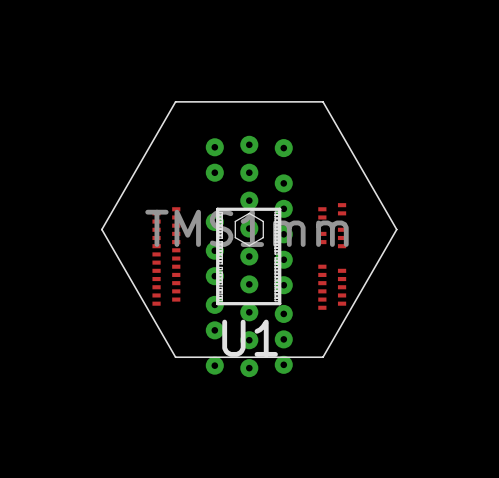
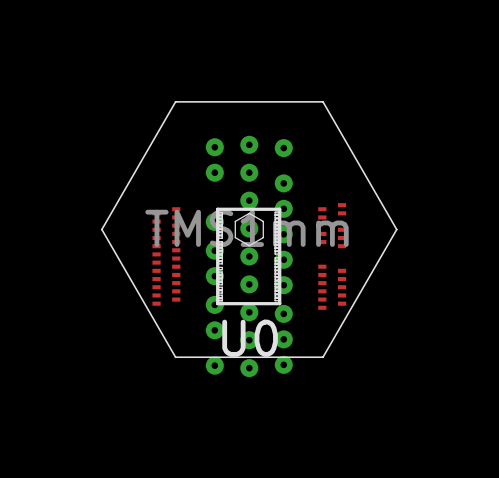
U1 name: U1 (250, 338) -> U0 (250, 338)

